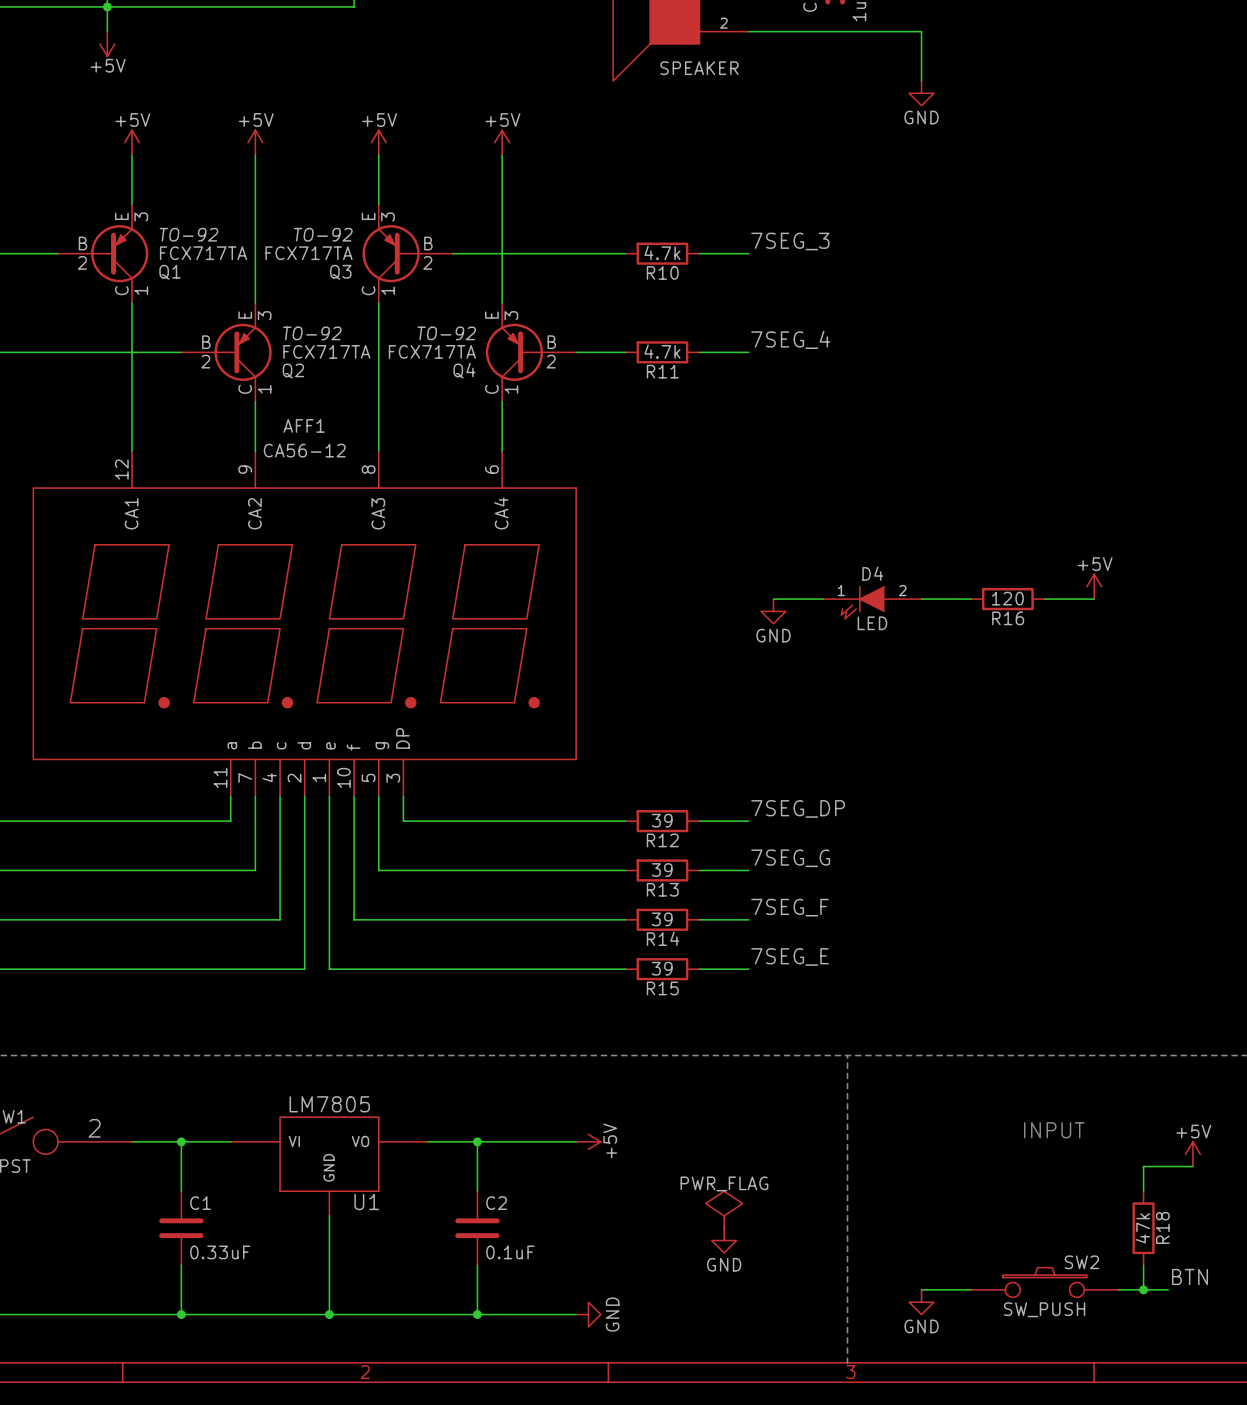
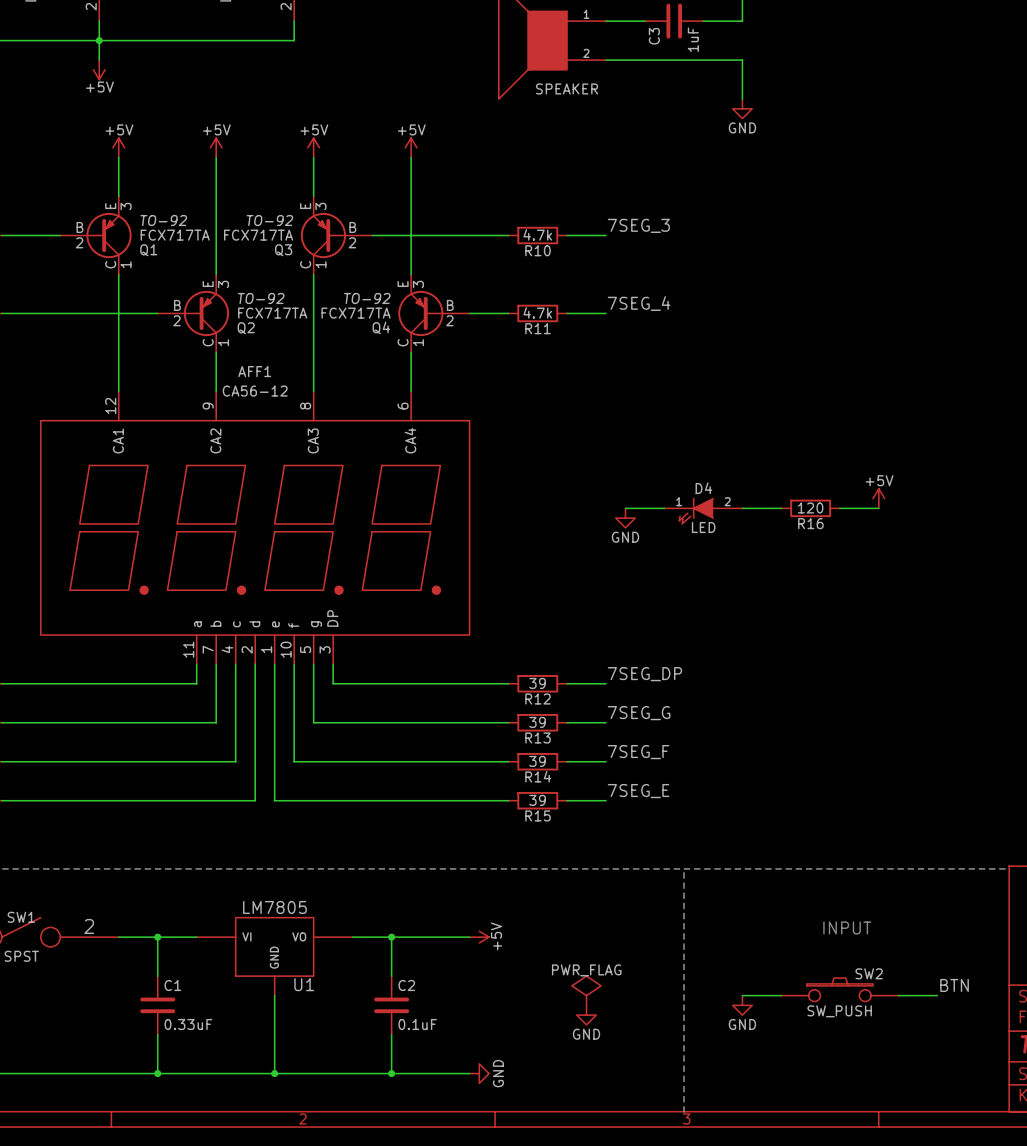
power symbol: +5V (1192, 1154) -> none
wire: (1192, 1166) (1143, 1166) (1143, 1191) -> none
R18: 47k (1143, 1228) -> none
wire: (1143, 1265) (1143, 1289) -> none
label position: BTN (1190, 1276) -> BTN (954, 985)
SW2 position: (1044, 1282) -> (839, 989)
wire: (921, 1289) (970, 1289) -> (742, 995) (781, 995)
wire: (1118, 1289) (1168, 1289) -> (898, 995) (937, 995)
junction: (1143, 1289) -> none
power symbol position: GND (921, 1302) -> GND (742, 1005)

